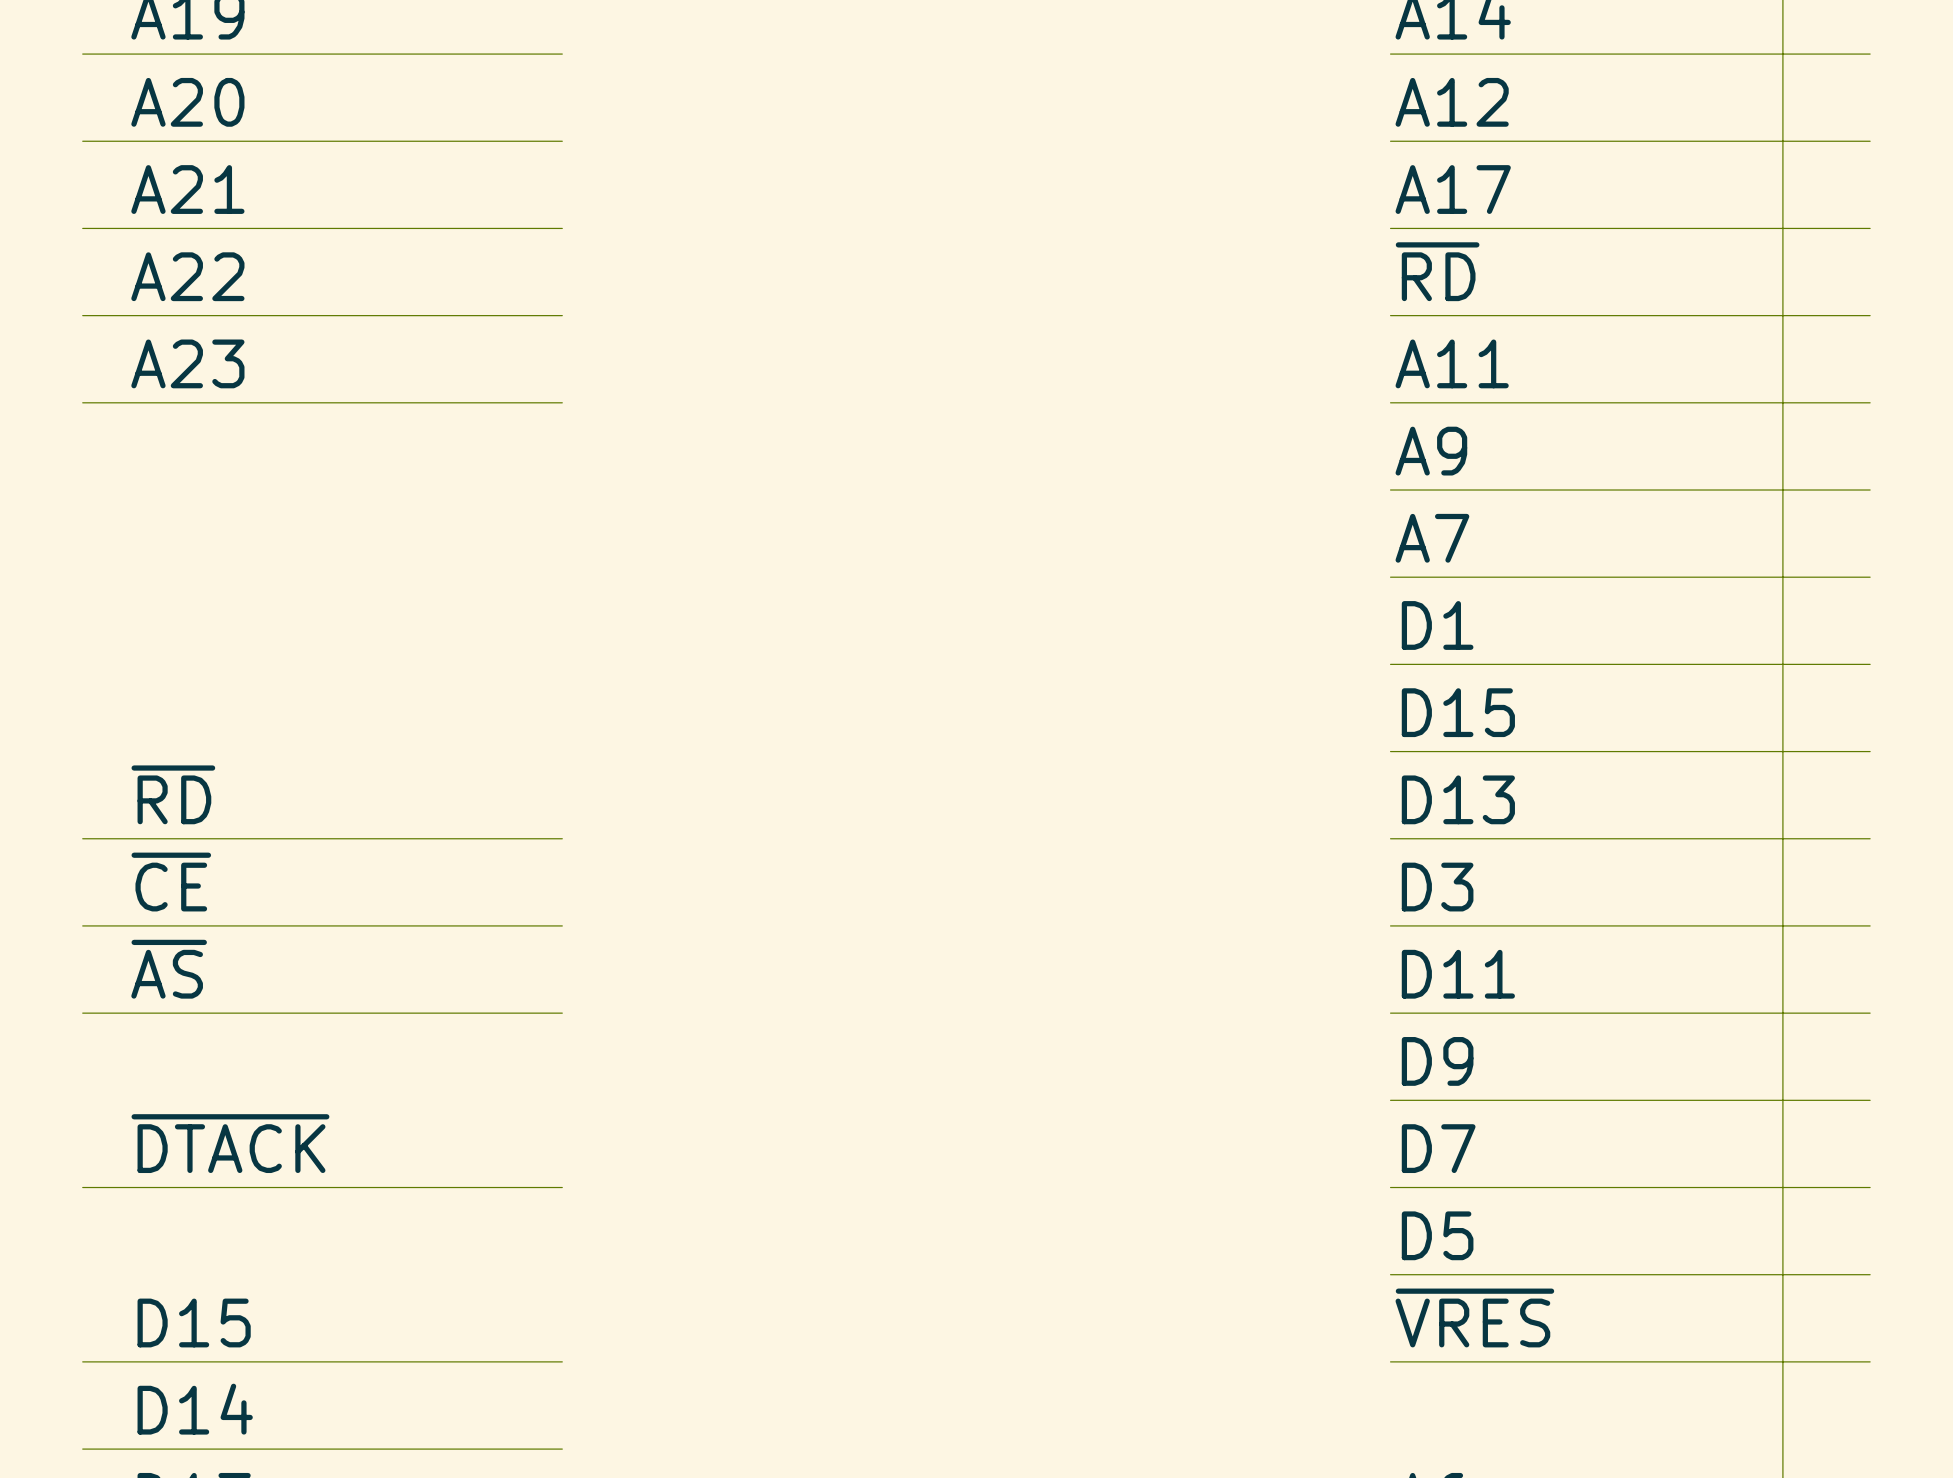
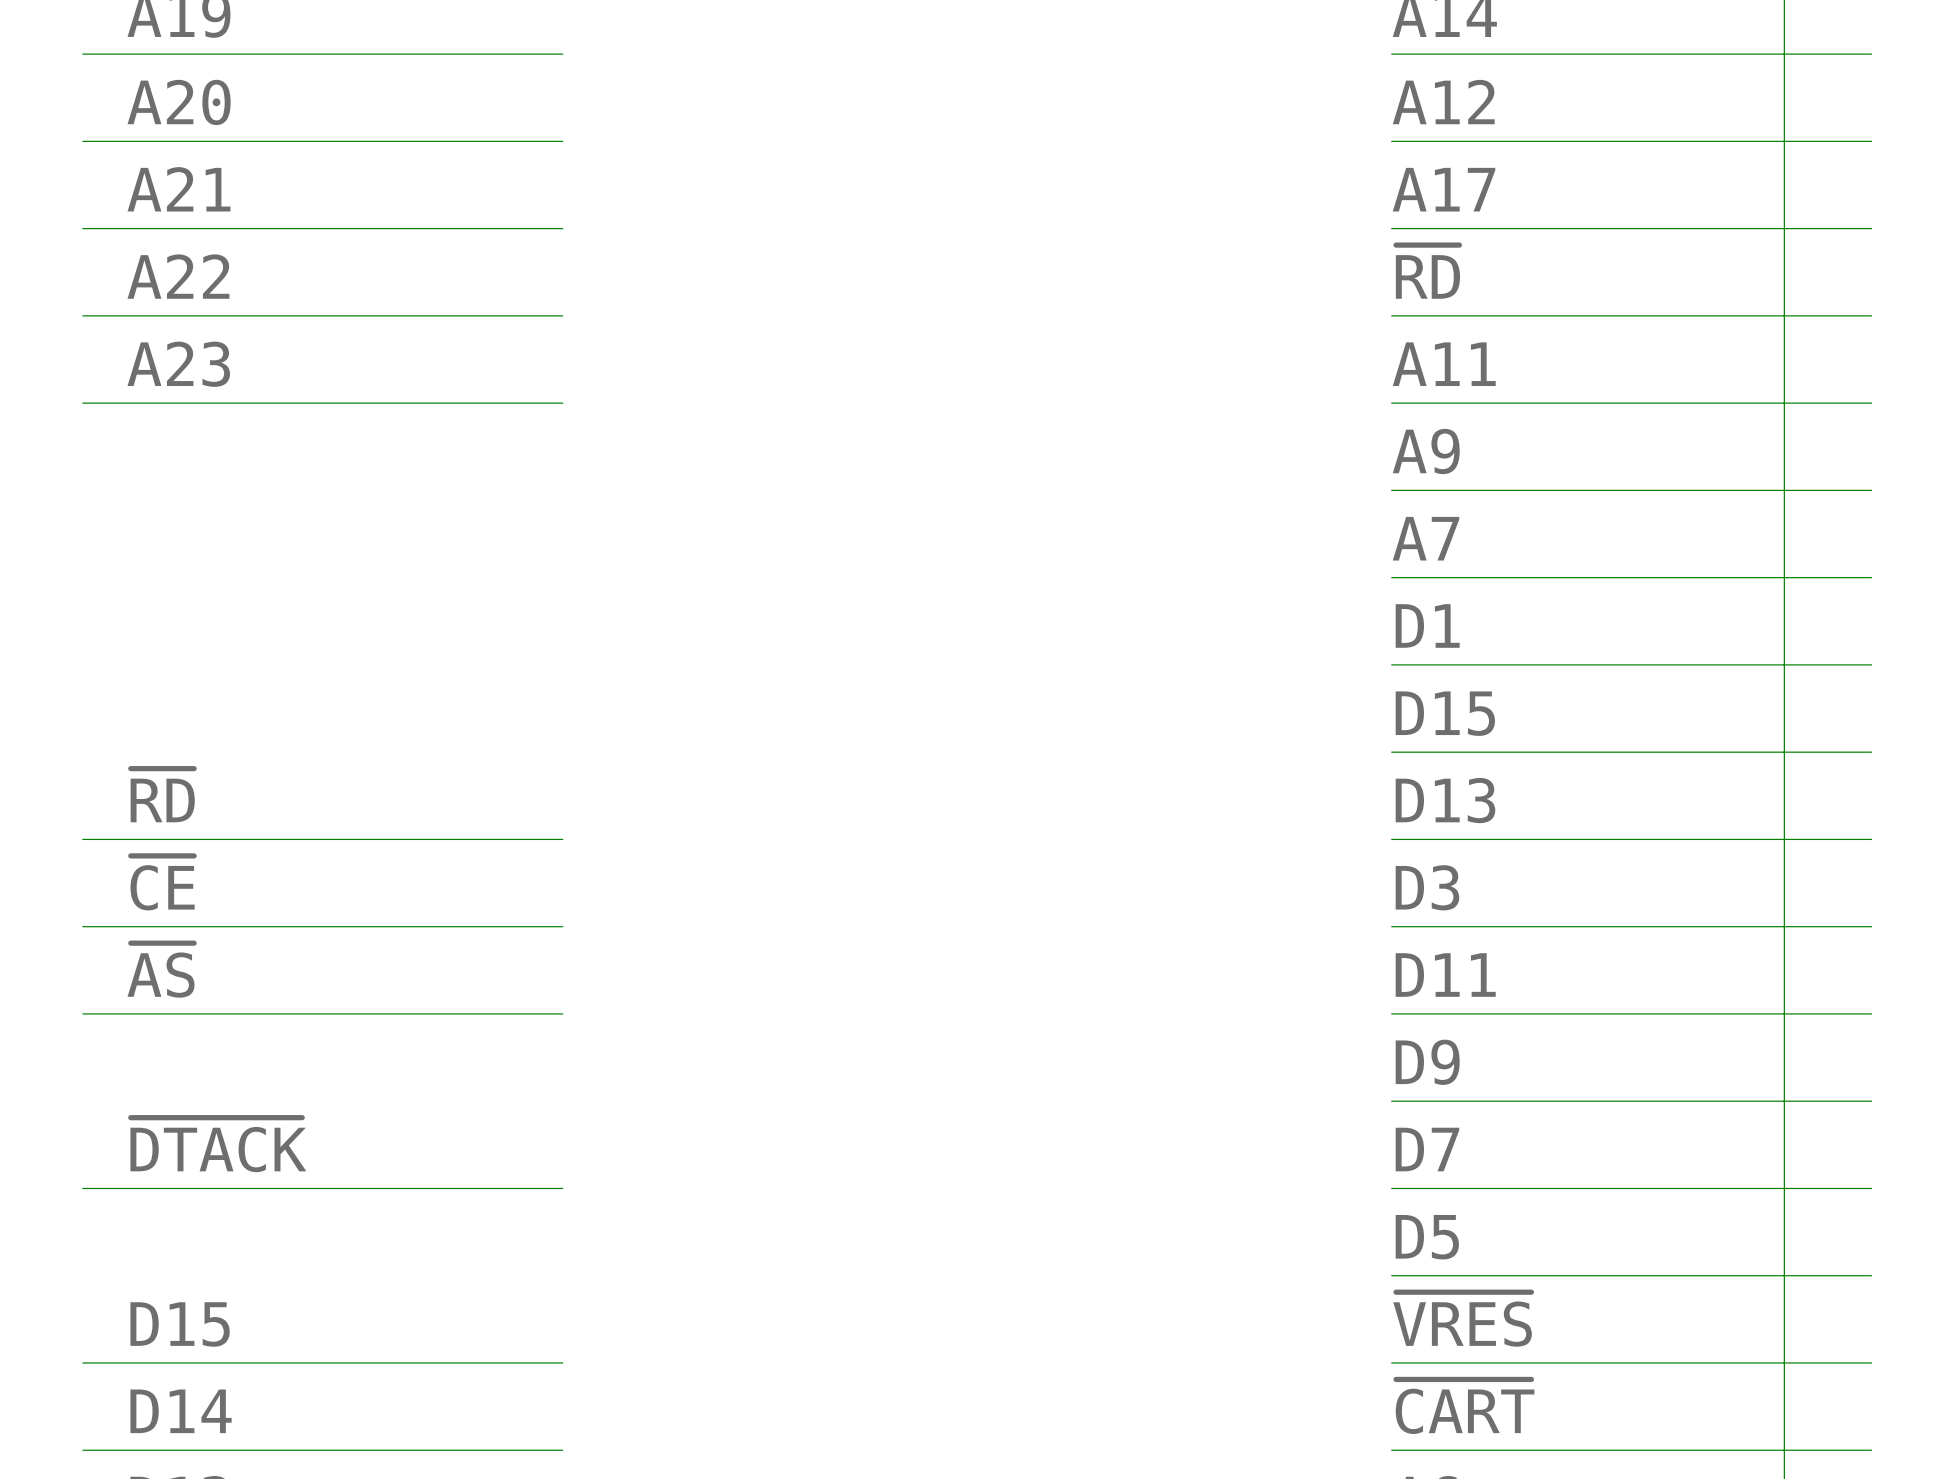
label: none -> ~{CART} (1465, 1406)
wire: none -> (1391, 1450) (1871, 1450)

